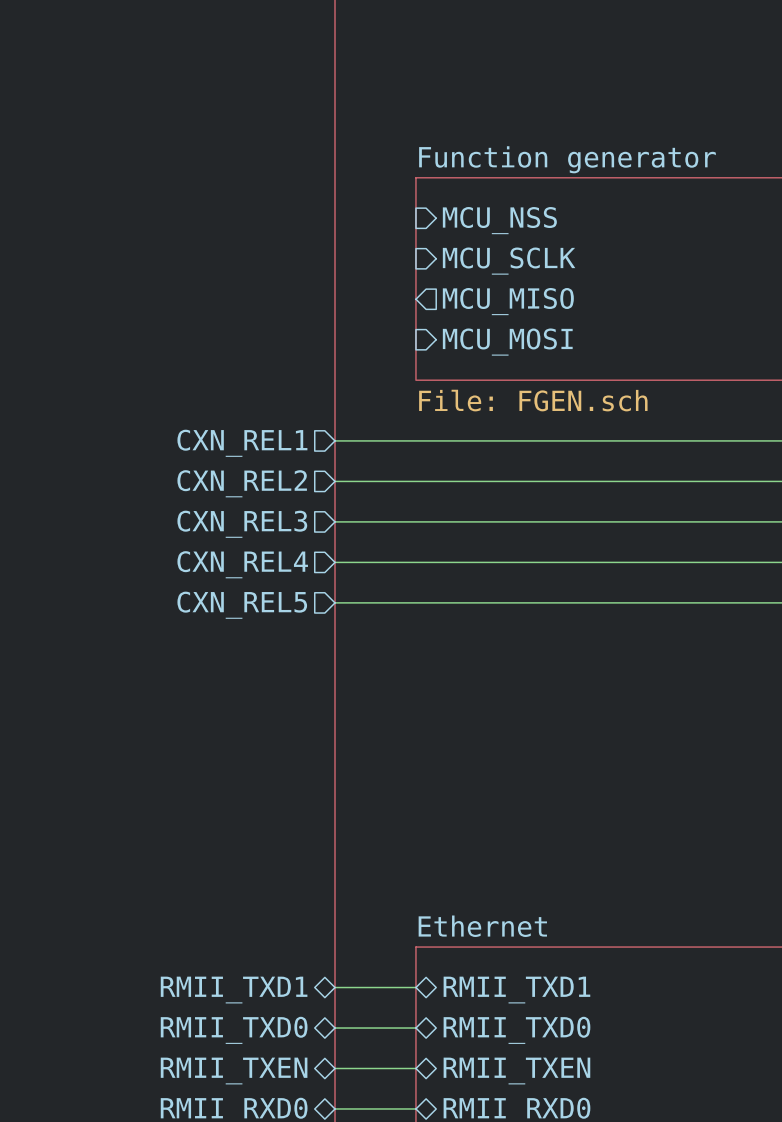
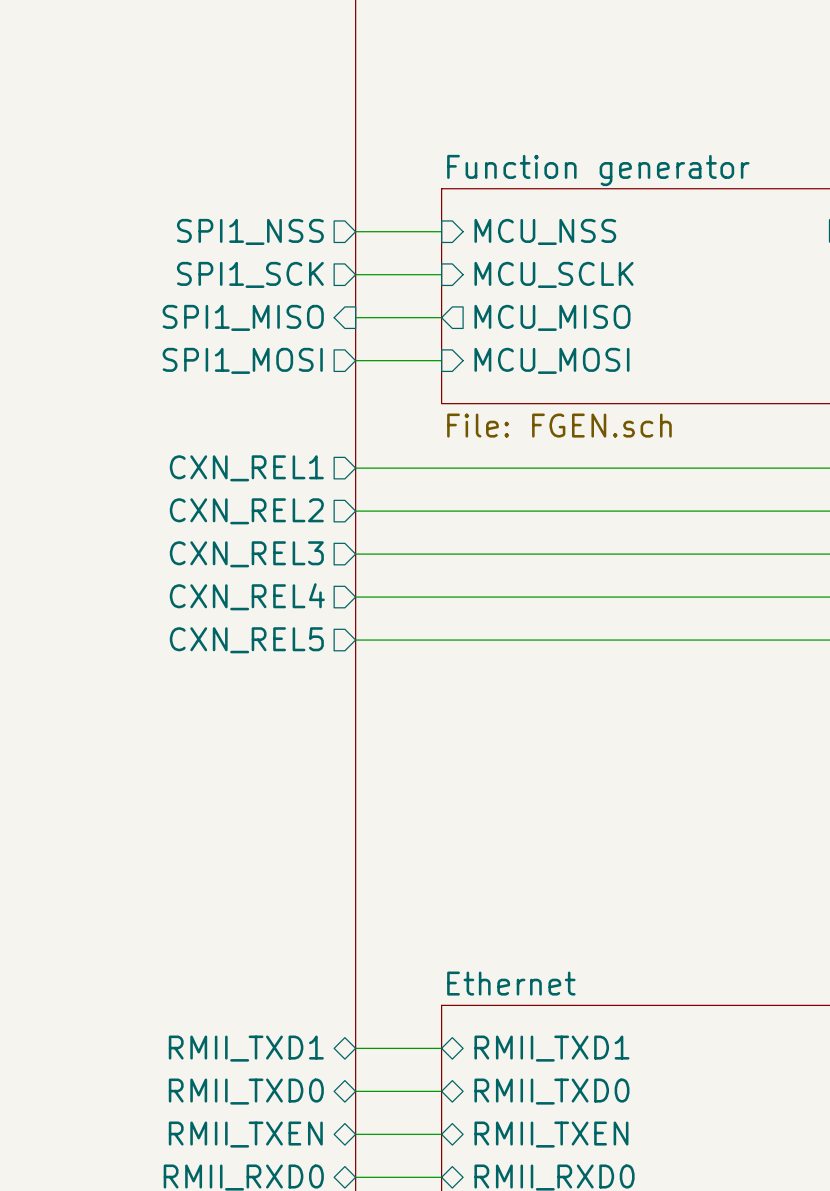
wire: none -> (355, 231) (441, 231)
sheet pin: none -> SPI1_NSS (250, 231)
wire: none -> (355, 274) (441, 274)
sheet pin: none -> SPI1_SCK (250, 274)
wire: none -> (355, 317) (441, 317)
sheet pin: none -> SPI1_MISO (243, 317)
wire: none -> (355, 360) (441, 360)
sheet pin: none -> SPI1_MOSI (242, 360)

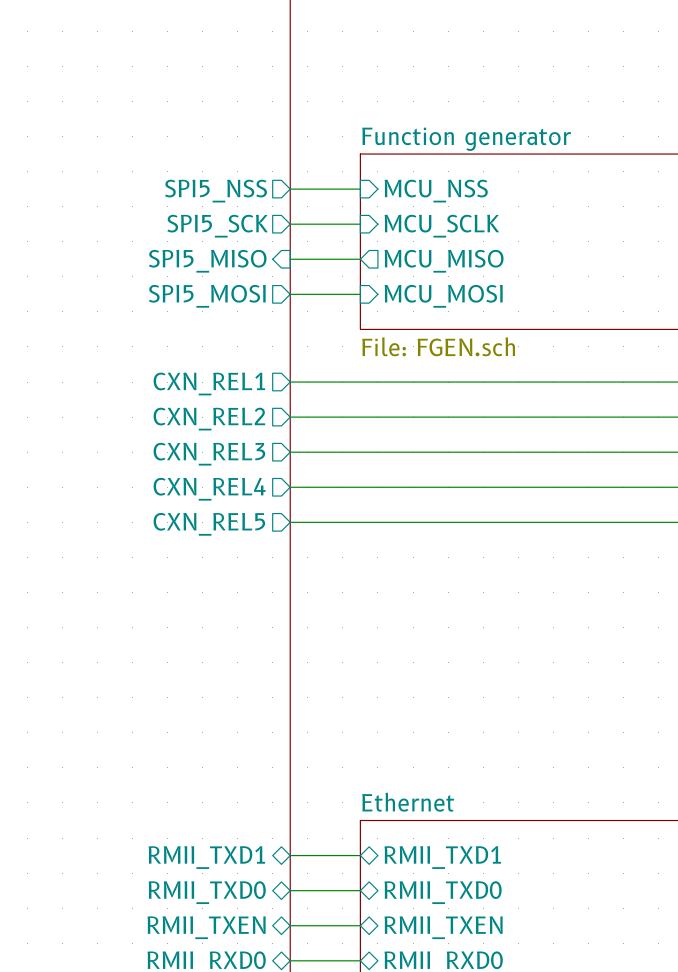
sheet pin: SPI1_NSS (250, 231) -> SPI5_NSS (215, 191)
sheet pin: SPI1_SCK (250, 274) -> SPI5_SCK (217, 226)
sheet pin: SPI1_MISO (243, 317) -> SPI5_MISO (207, 261)
sheet pin: SPI1_MOSI (242, 360) -> SPI5_MOSI (207, 296)

